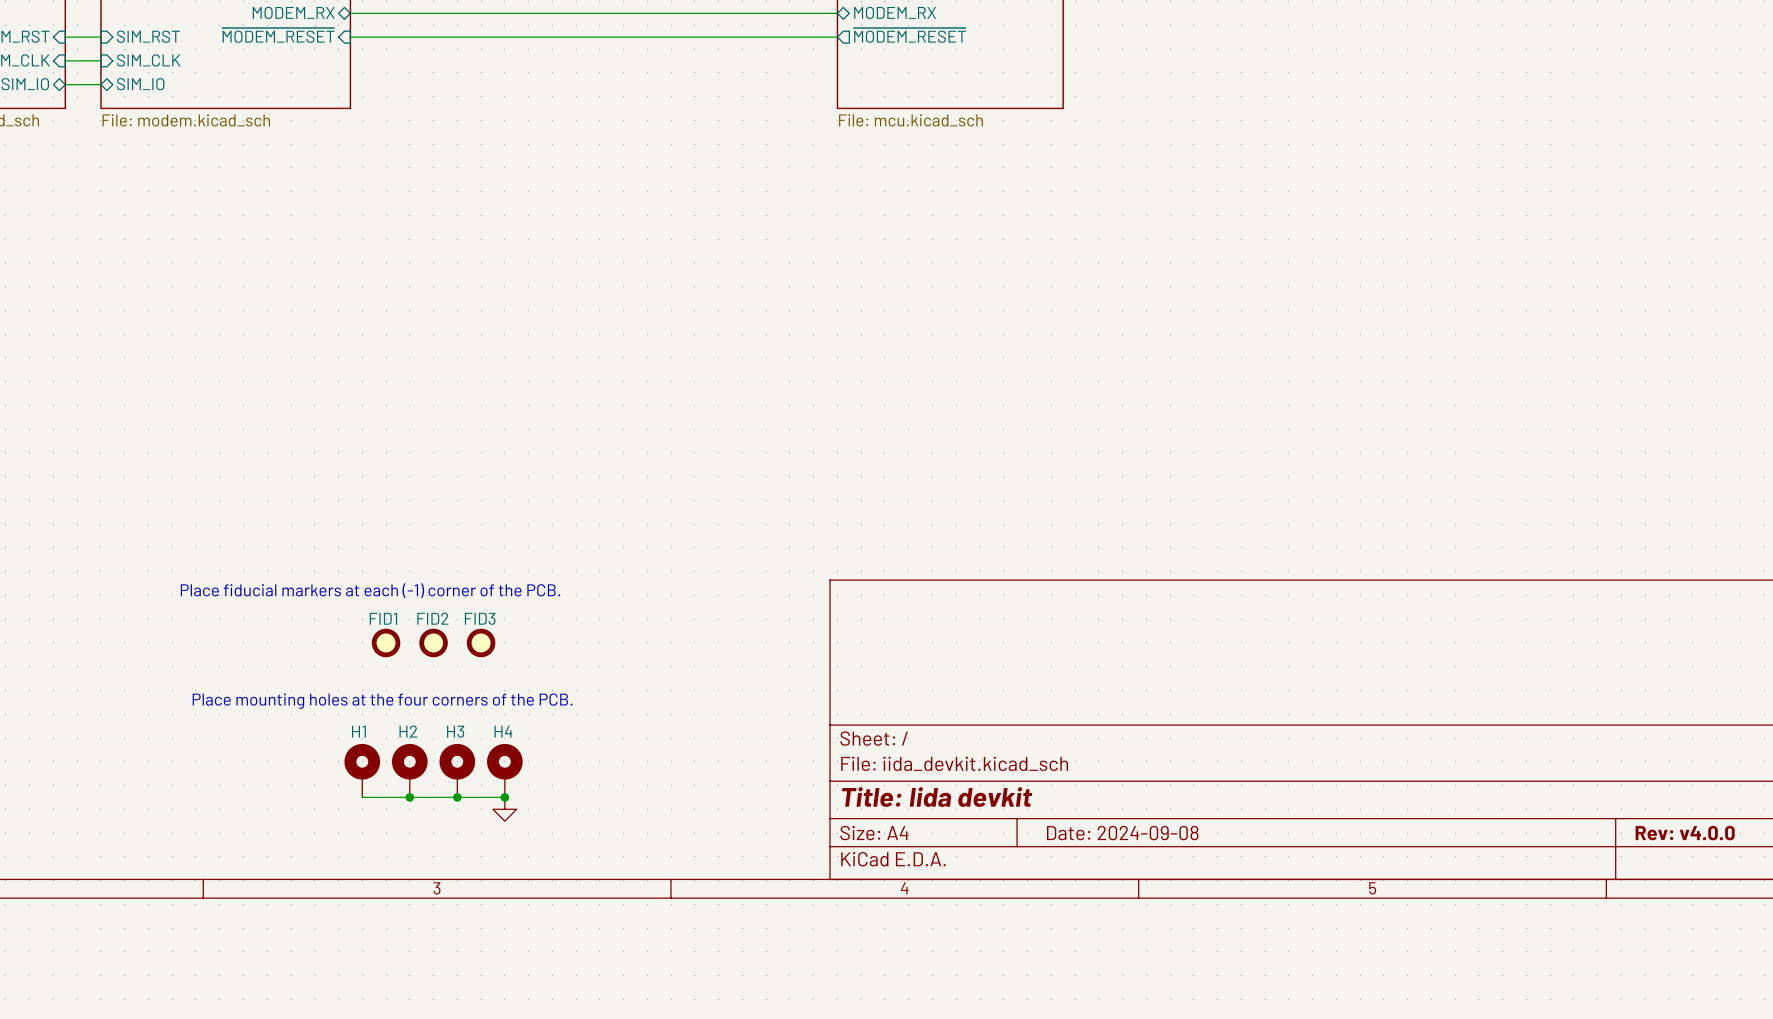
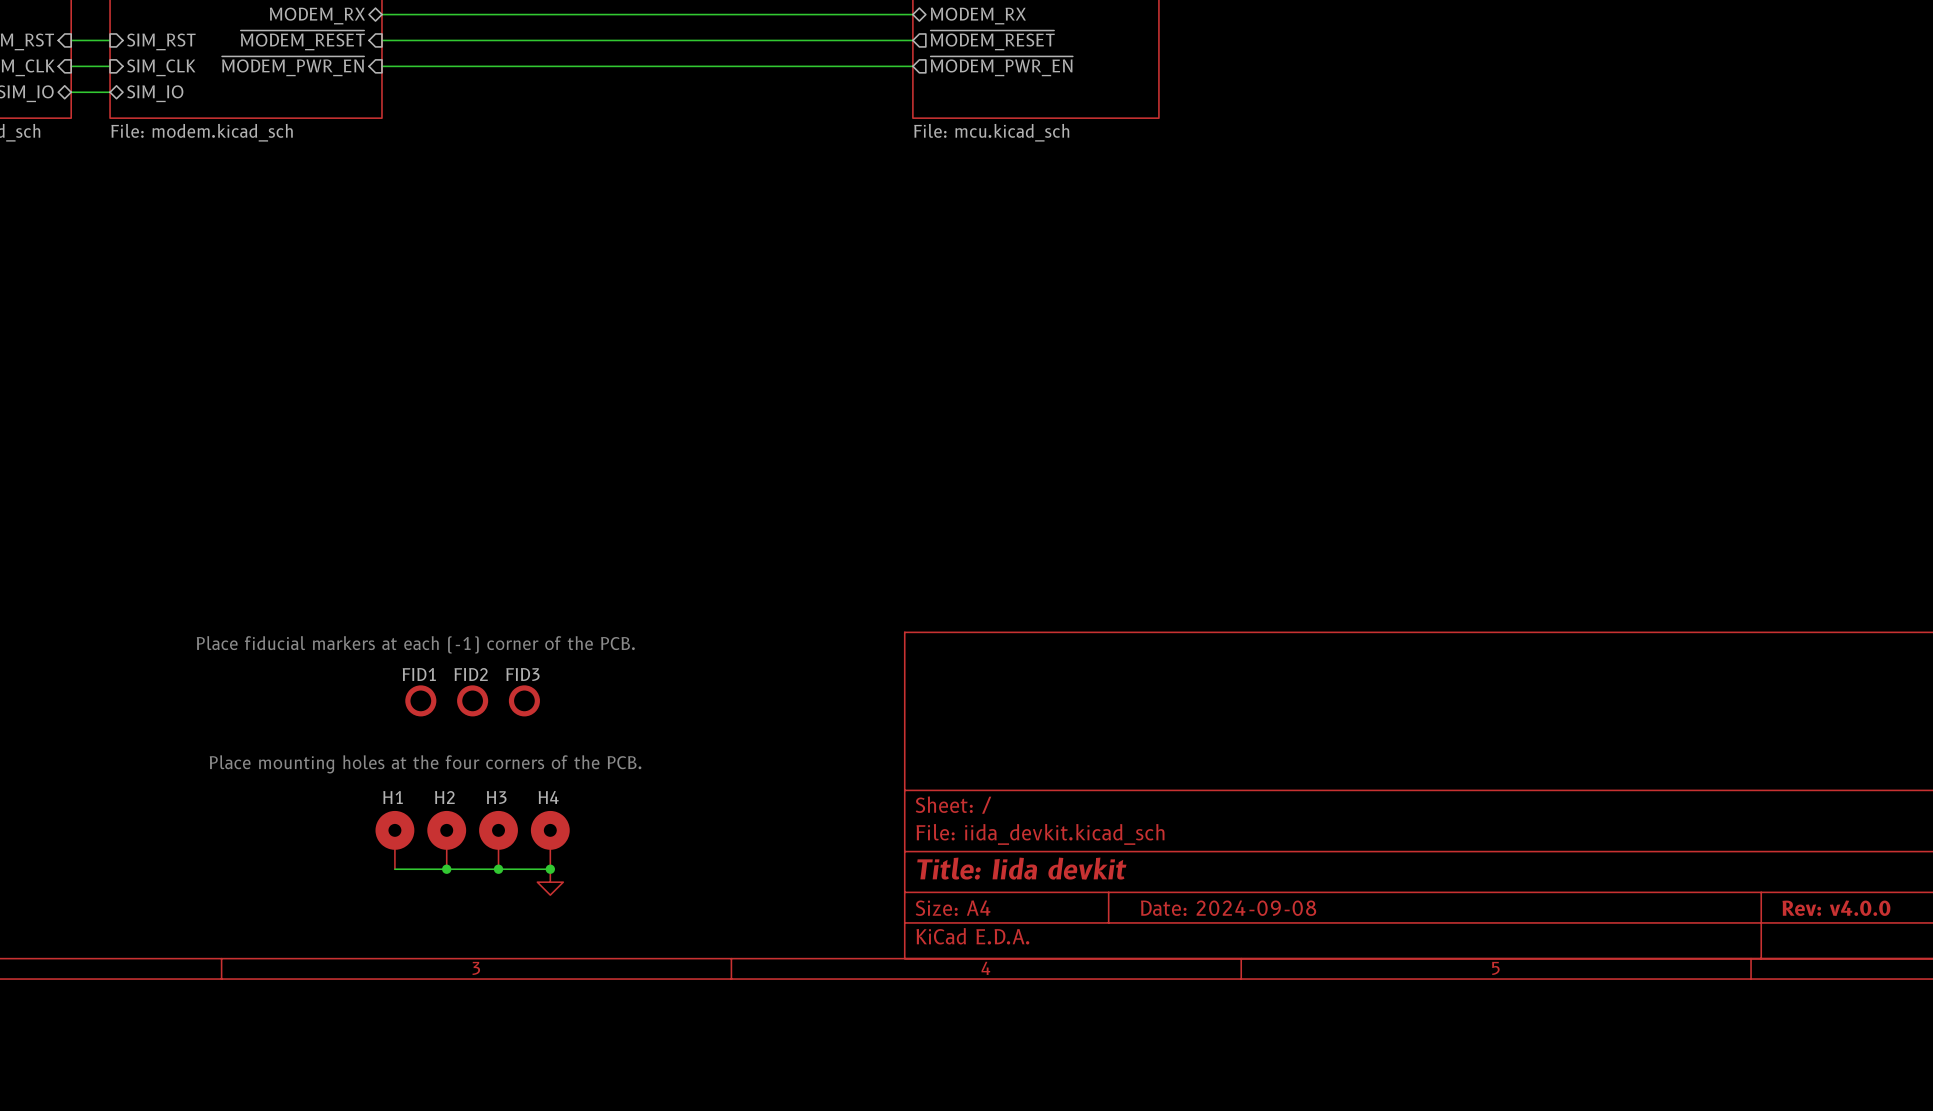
sheet pin: none -> ~{MODEM_PWR_EN} (293, 66)
sheet pin: none -> ~{MODEM_PWR_EN} (1001, 66)
wire: none -> (381, 66) (912, 66)

